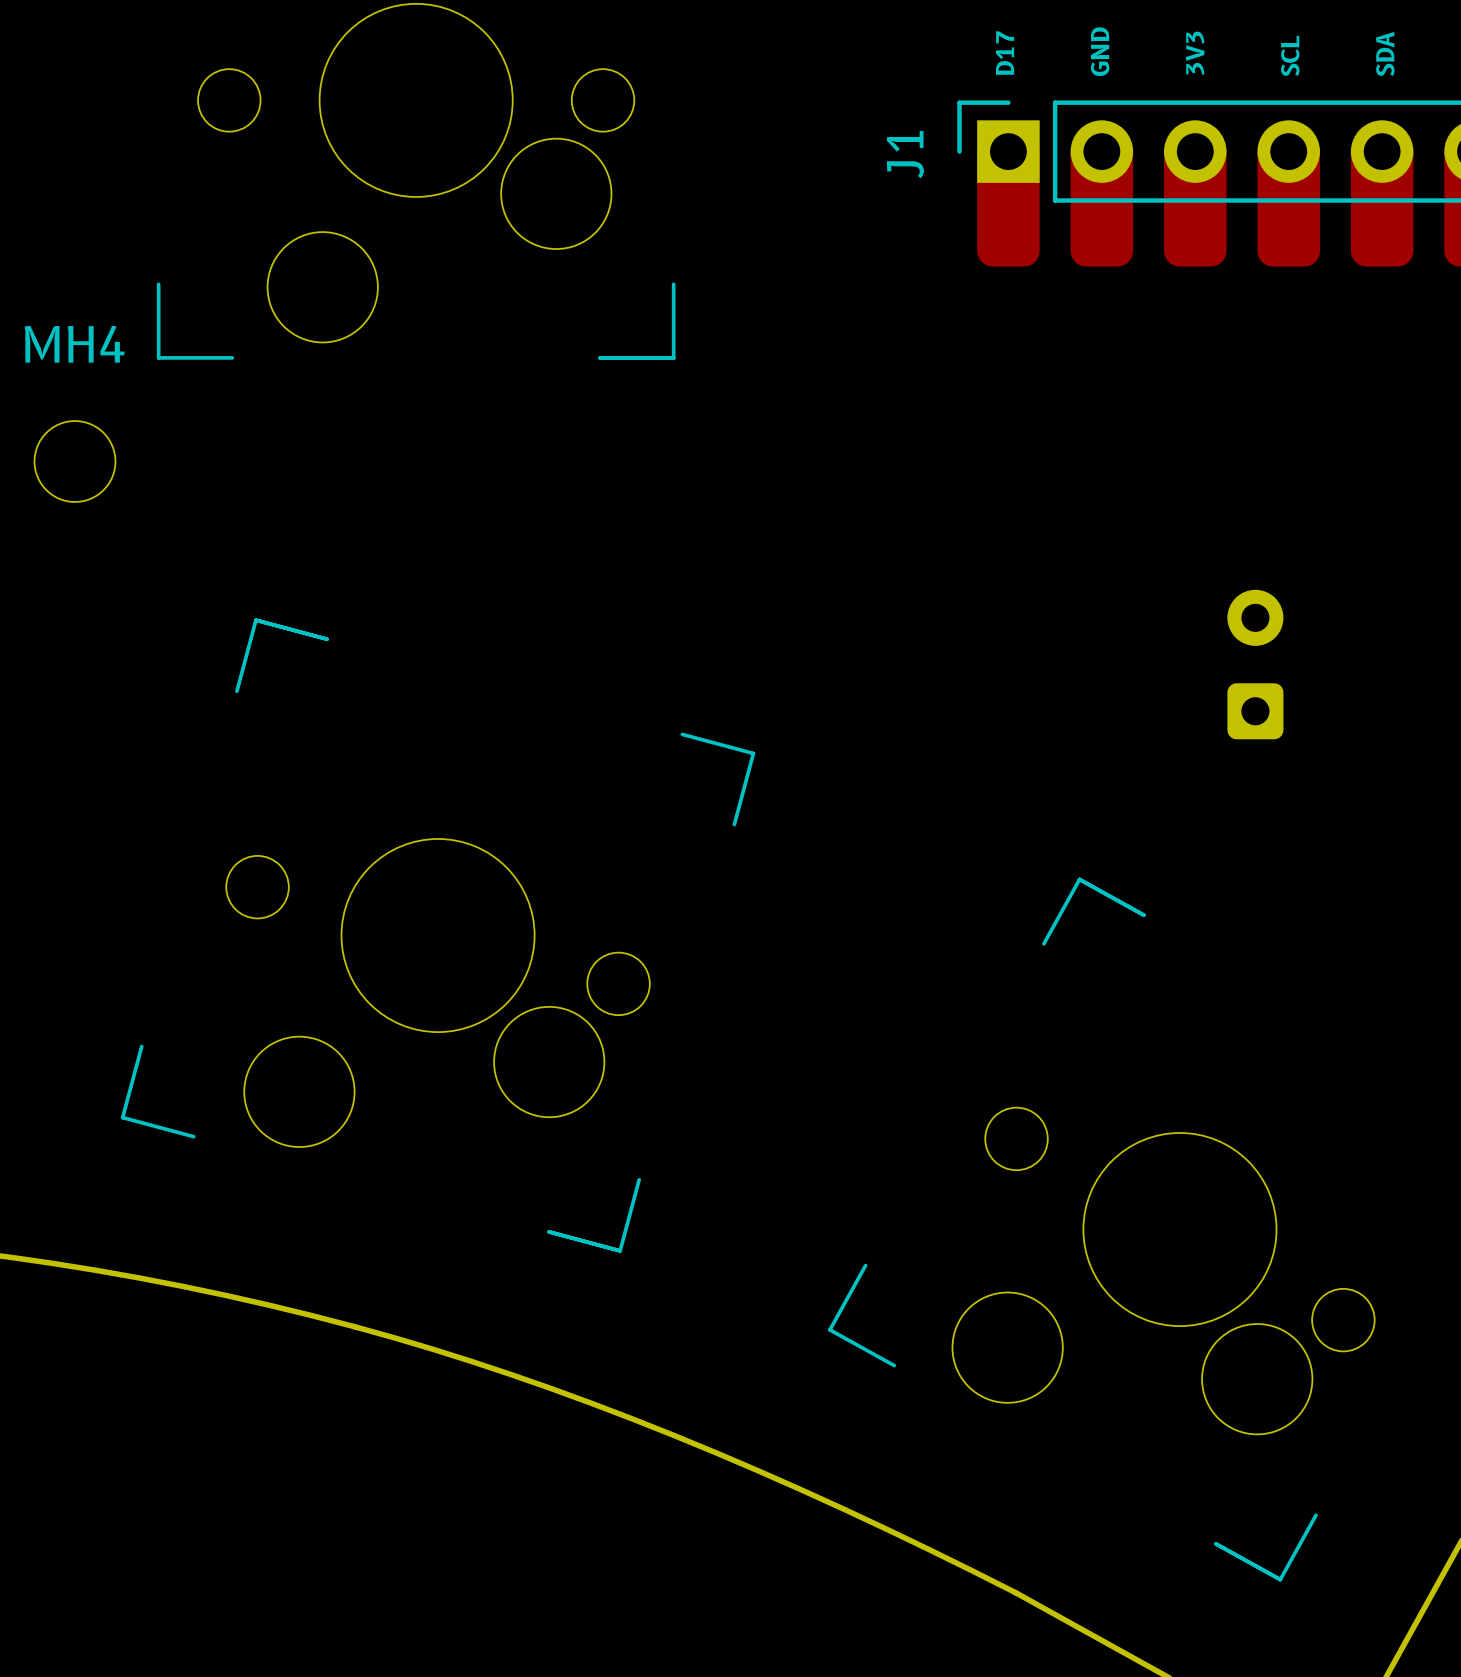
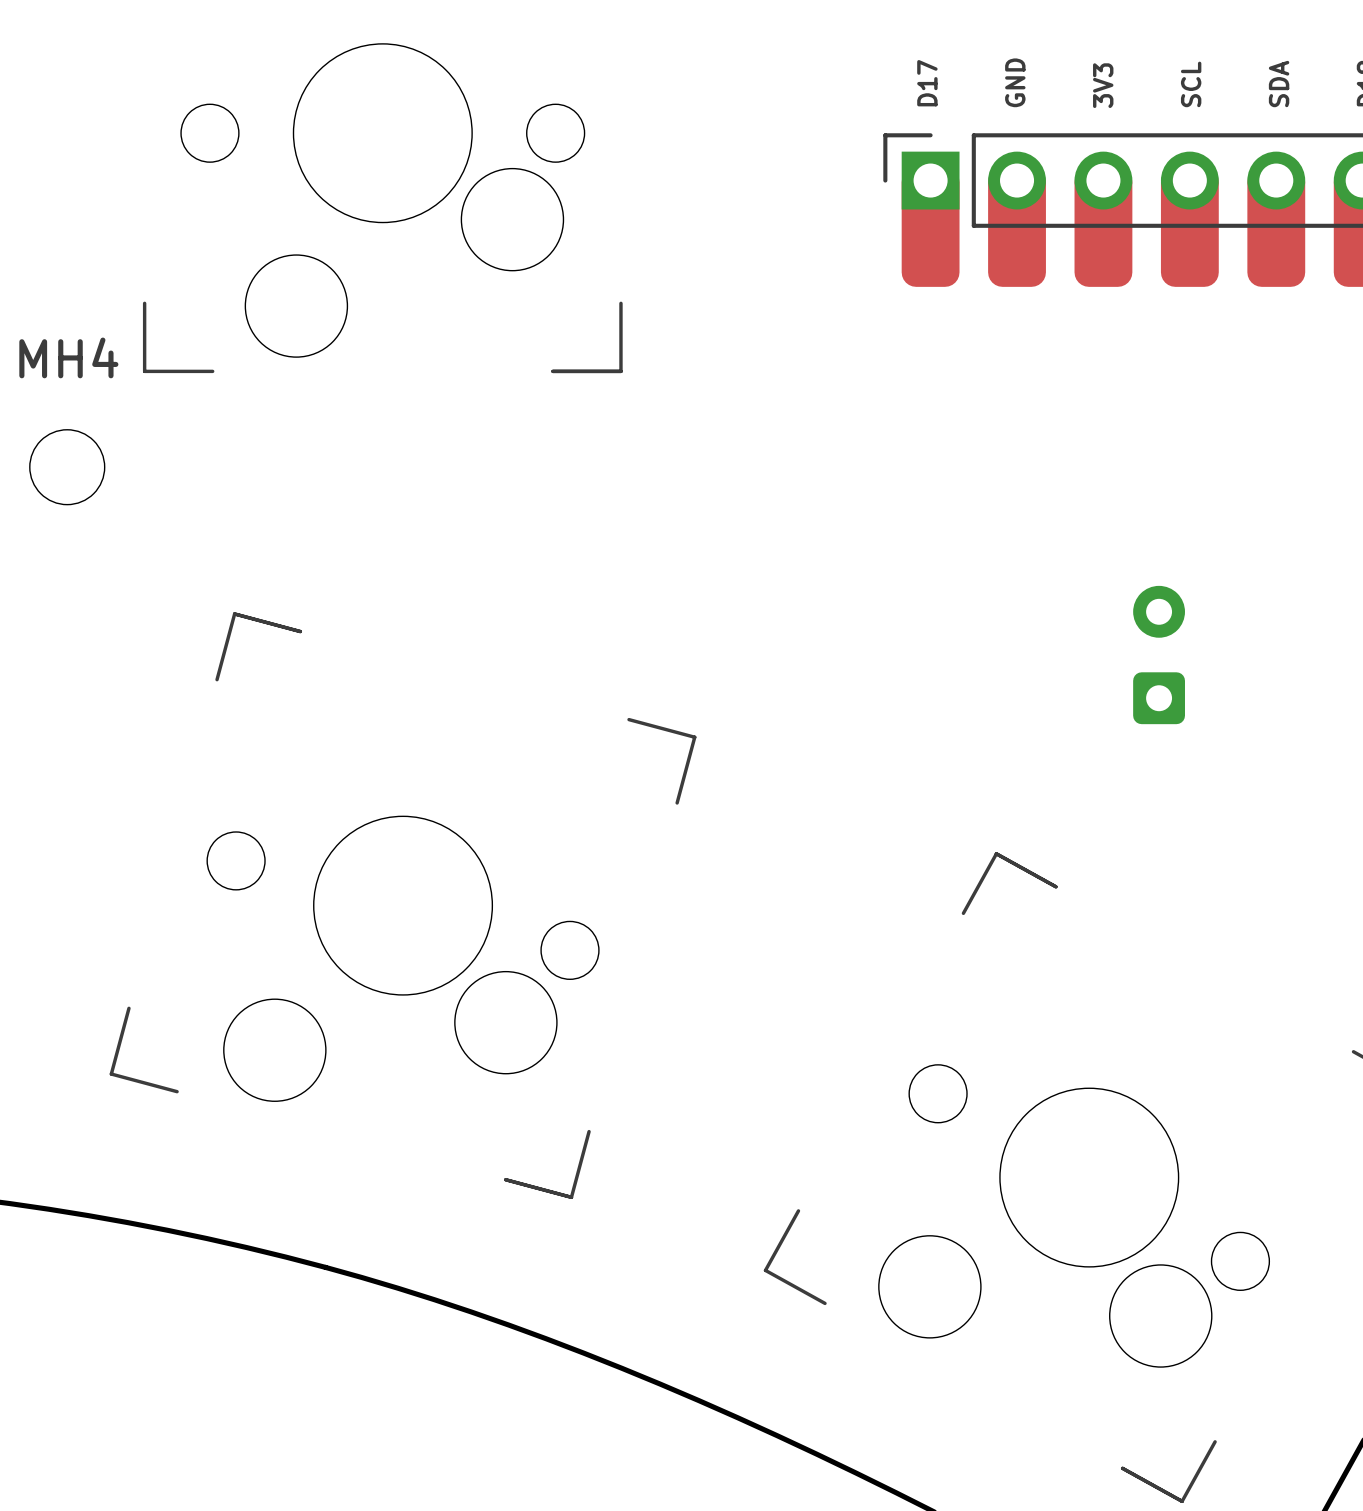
J1 name: J1 (905, 154) -> none

